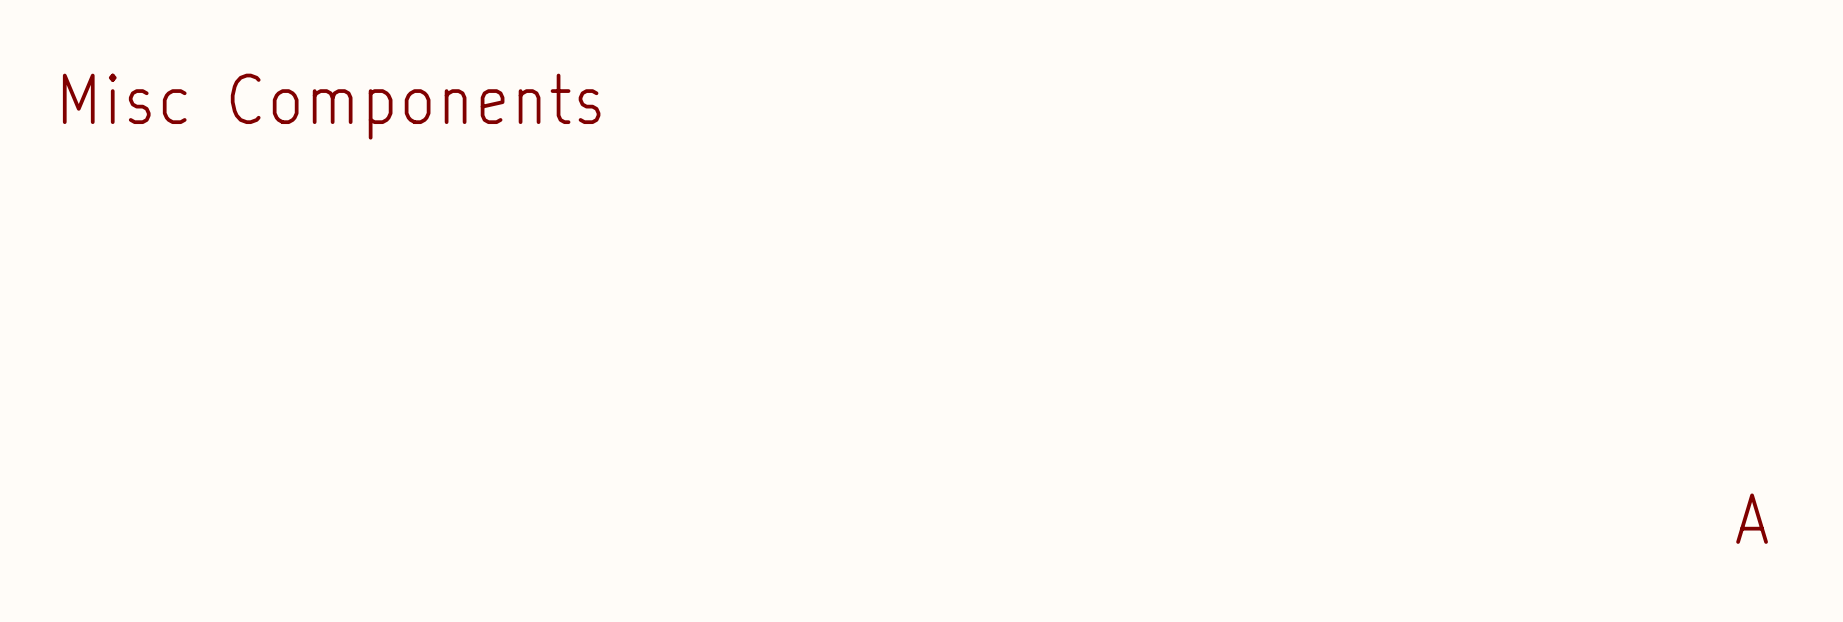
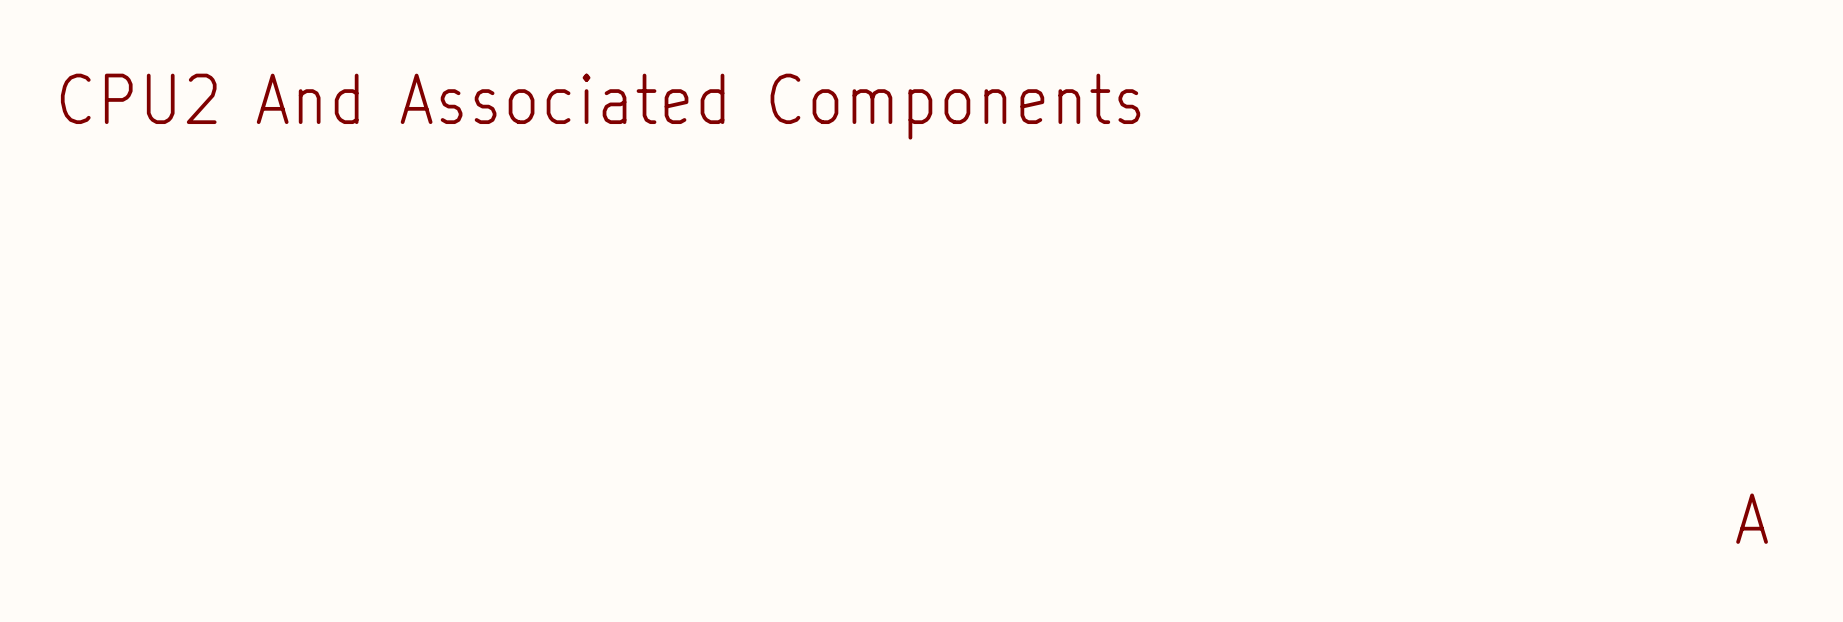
text: Misc Components (331, 106) -> CPU2 And Associated Components (600, 106)

